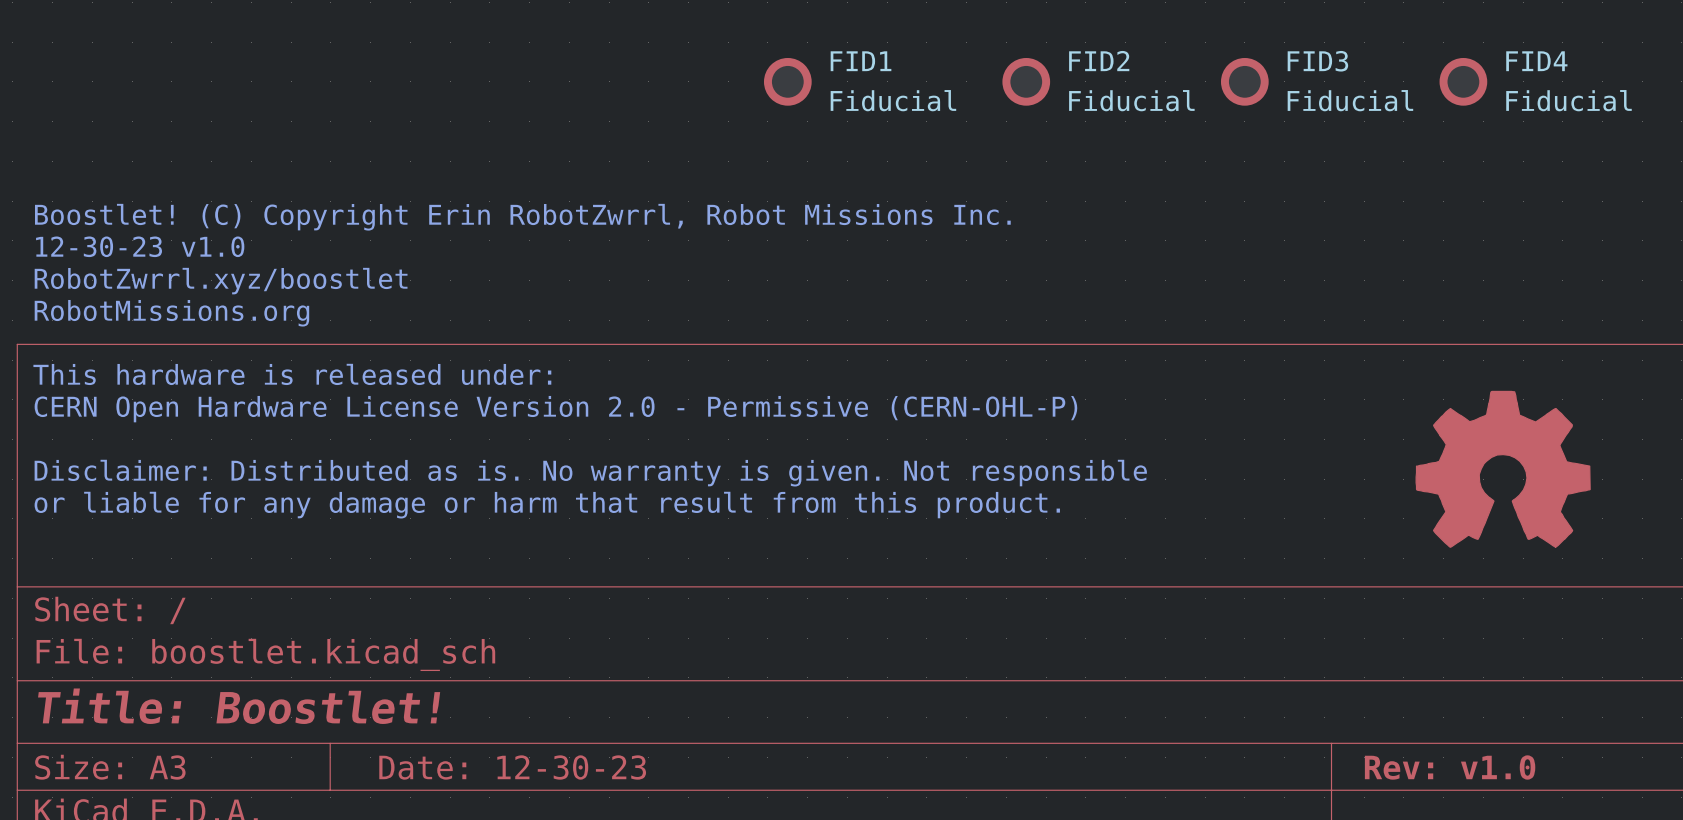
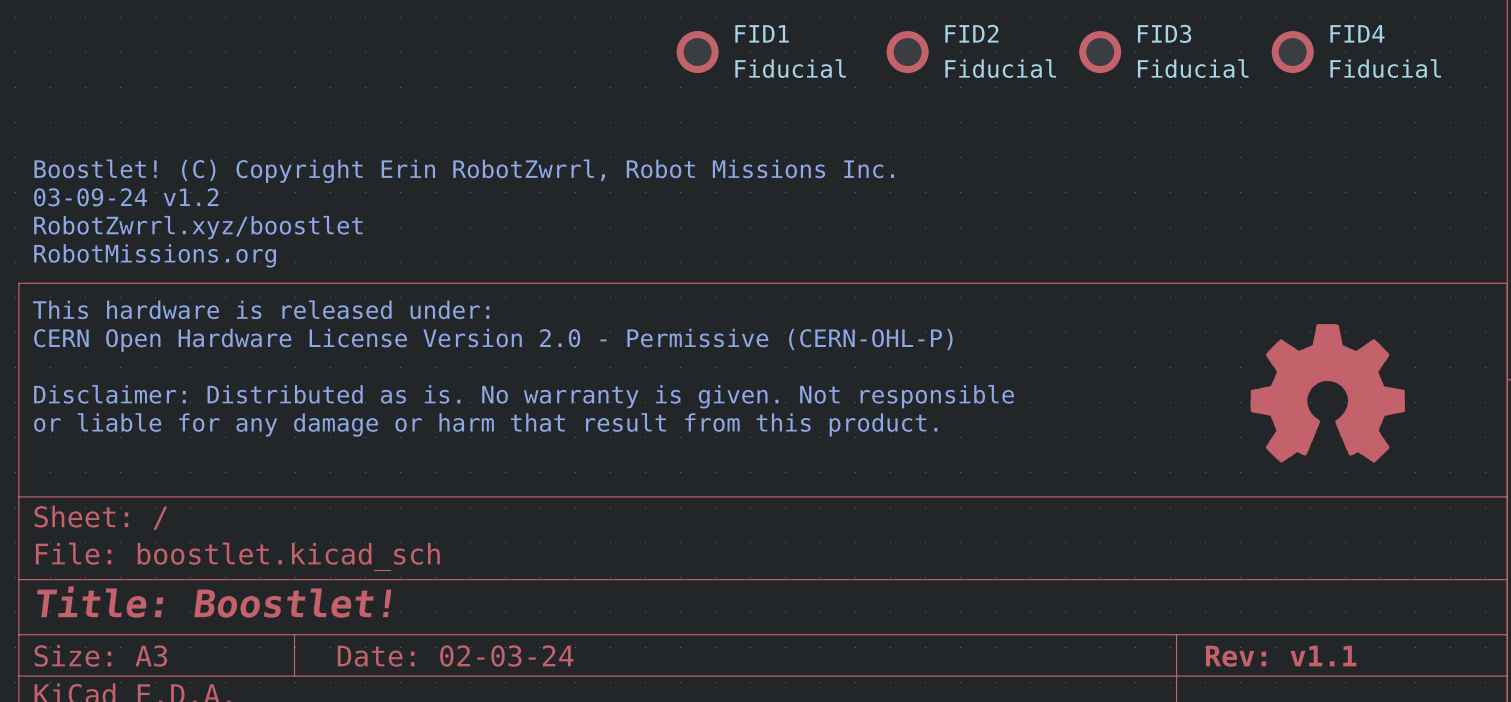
text: 12-30-23 v1.0 (140, 246) -> 03-09-24 v1.2 (126, 197)
title block: Date: 12-30-23 (512, 767) -> Date: 02-03-24 (455, 656)
title block: Rev: v1.0 (1450, 767) -> Rev: v1.1 (1281, 656)

